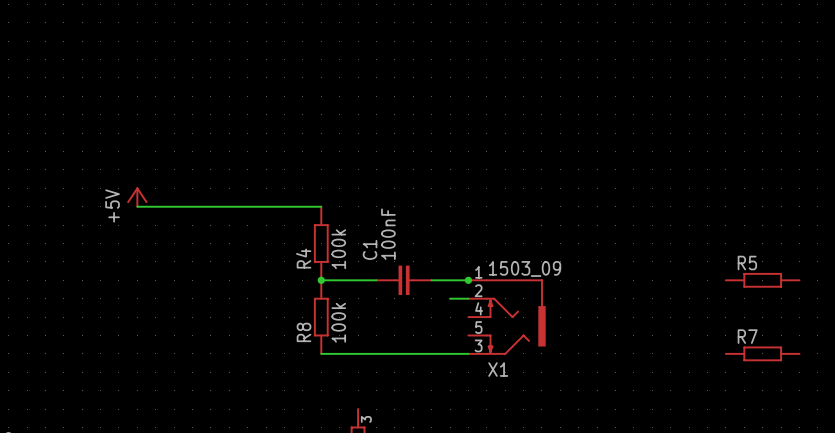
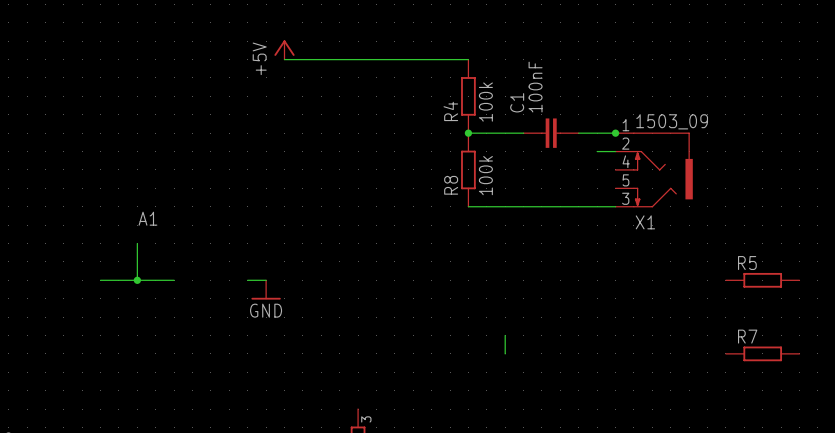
power symbol: none -> +5V (284, 49)
wire: none -> (284, 59) (468, 59)
wire: none -> (468, 133) (523, 133)
junction: none -> (468, 133)
wire: none -> (578, 133) (615, 133)
junction: none -> (615, 133)
wire: none -> (597, 151) (615, 151)
power symbol: +5V (137, 197) -> none
wire: (137, 206) (321, 206) -> none
wire: none -> (468, 206) (615, 206)
label: none -> A1 (147, 218)
wire: none -> (137, 243) (137, 280)
R4 position: (321, 243) -> (468, 96)
wire: none -> (100, 280) (174, 280)
junction: none -> (137, 280)
wire: none -> (247, 280) (266, 280)
wire: (321, 280) (376, 280) -> none
junction: (321, 280) -> none
C1 position: (404, 280) -> (551, 133)
wire: (431, 280) (468, 280) -> none
junction: (468, 280) -> none
power symbol: none -> GND (266, 289)
wire: (450, 298) (468, 298) -> none
R8 position: (321, 317) -> (468, 169)
X1 position: (507, 317) -> (654, 169)
wire: none -> (505, 335) (505, 353)
wire: (321, 353) (468, 353) -> none

